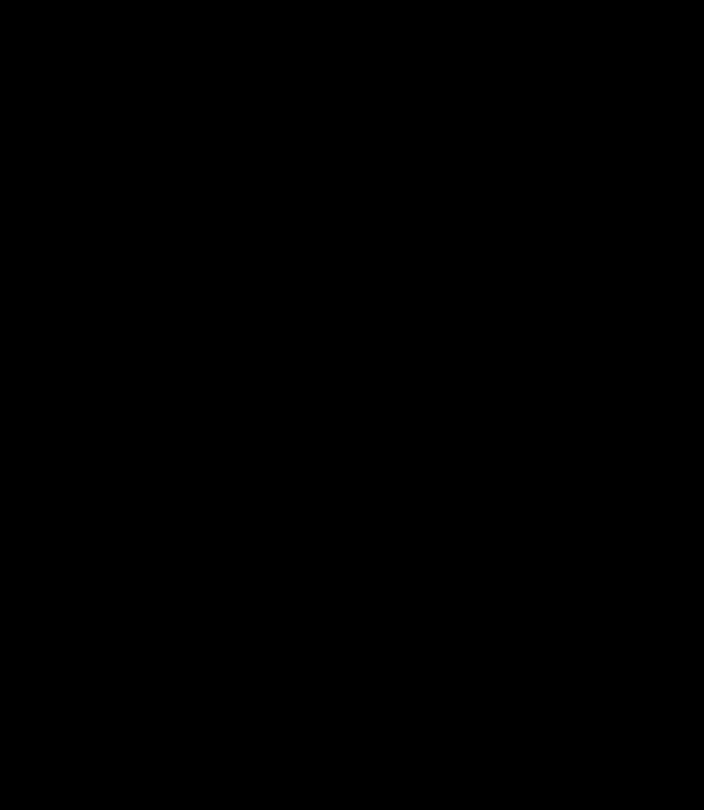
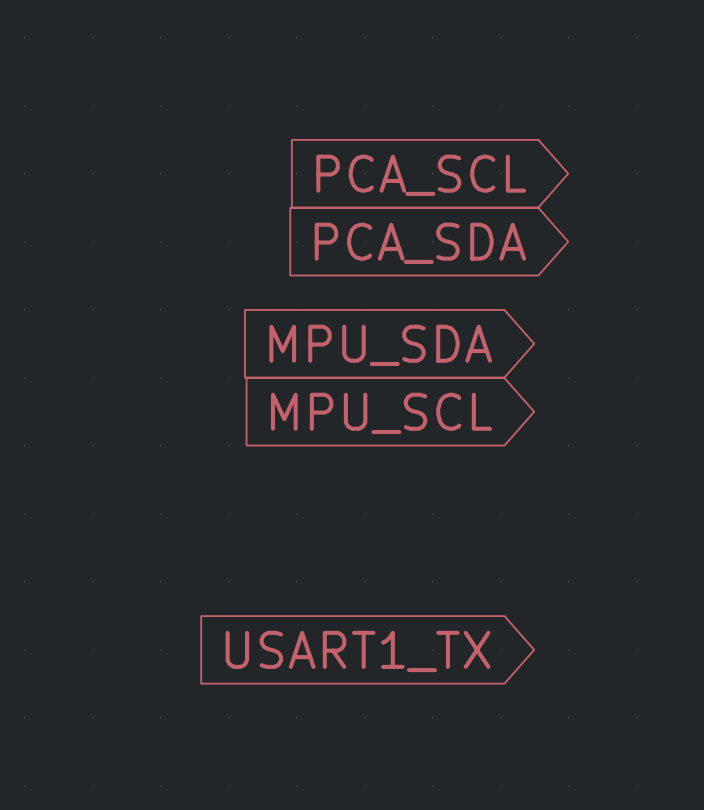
global label: none -> PCA_SCL (421, 175)
global label: none -> PCA_SDA (420, 243)
global label: none -> MPU_SDA (380, 345)
global label: none -> MPU_SCL (381, 413)
global label: none -> USART1_TX (358, 651)

